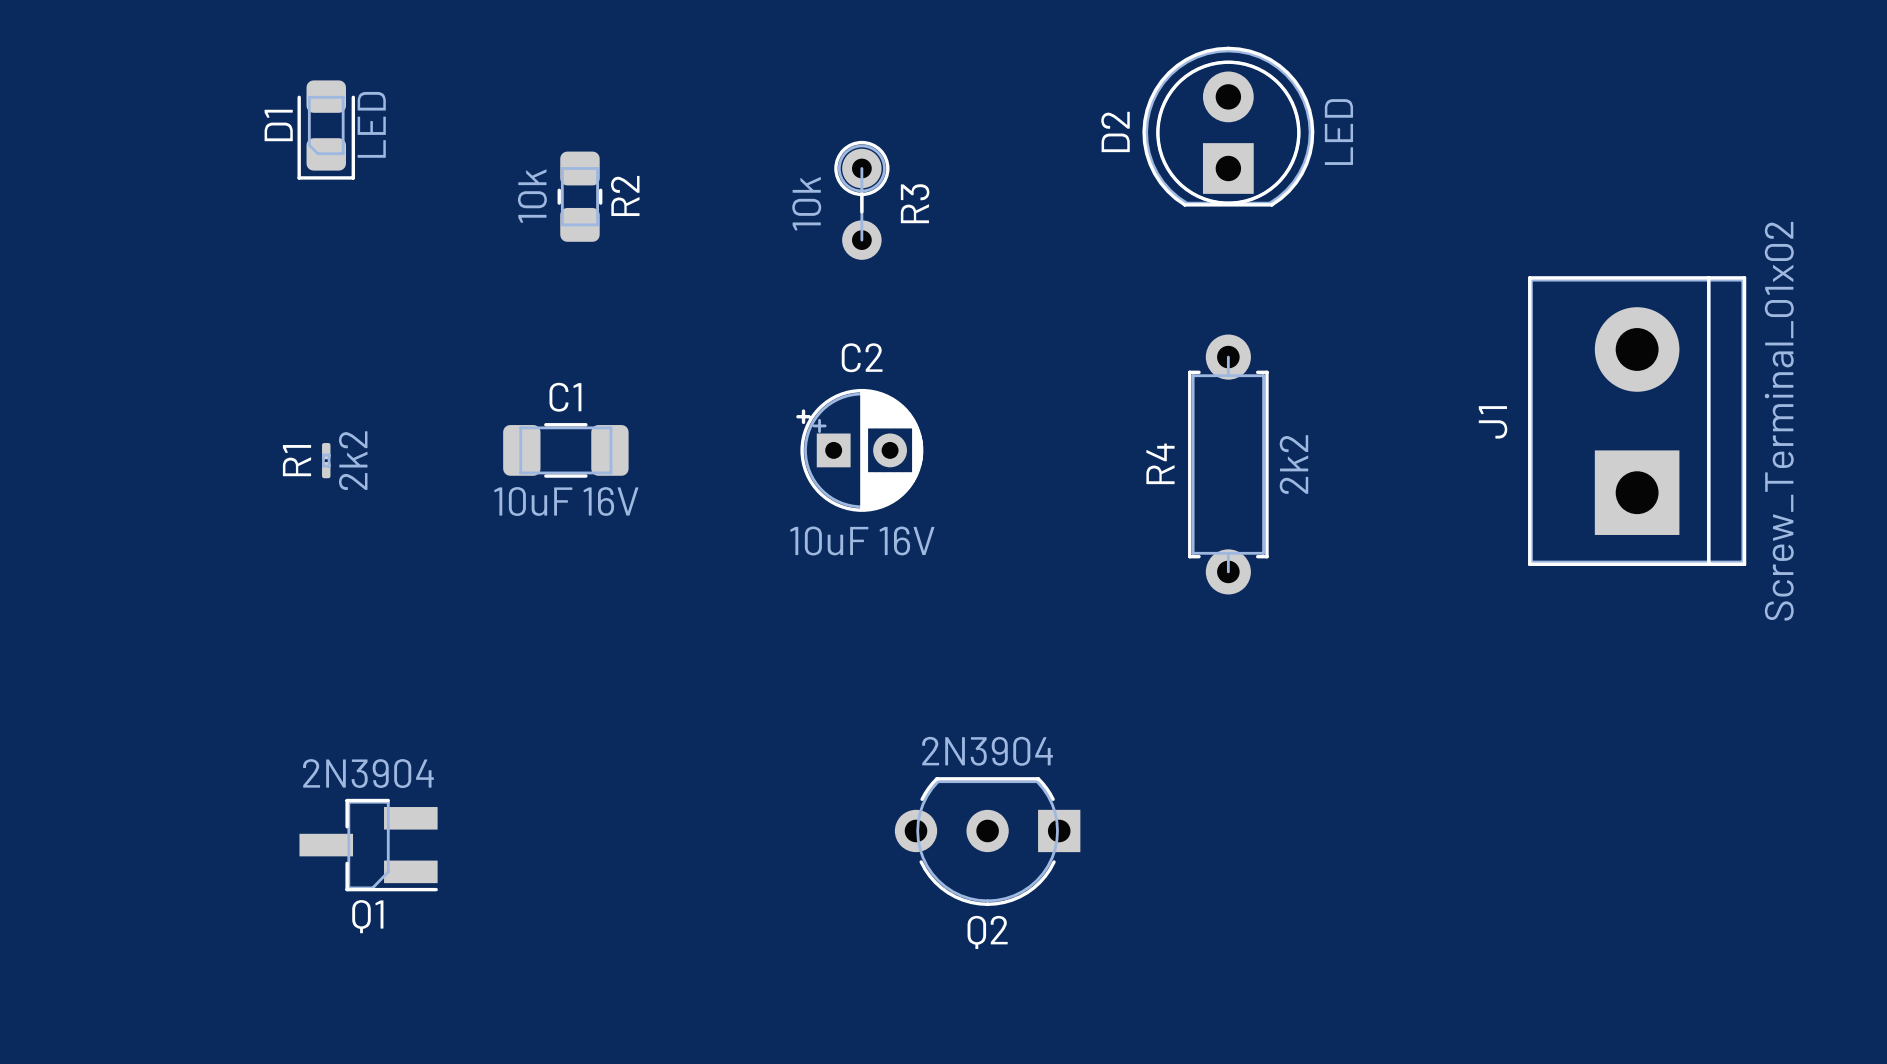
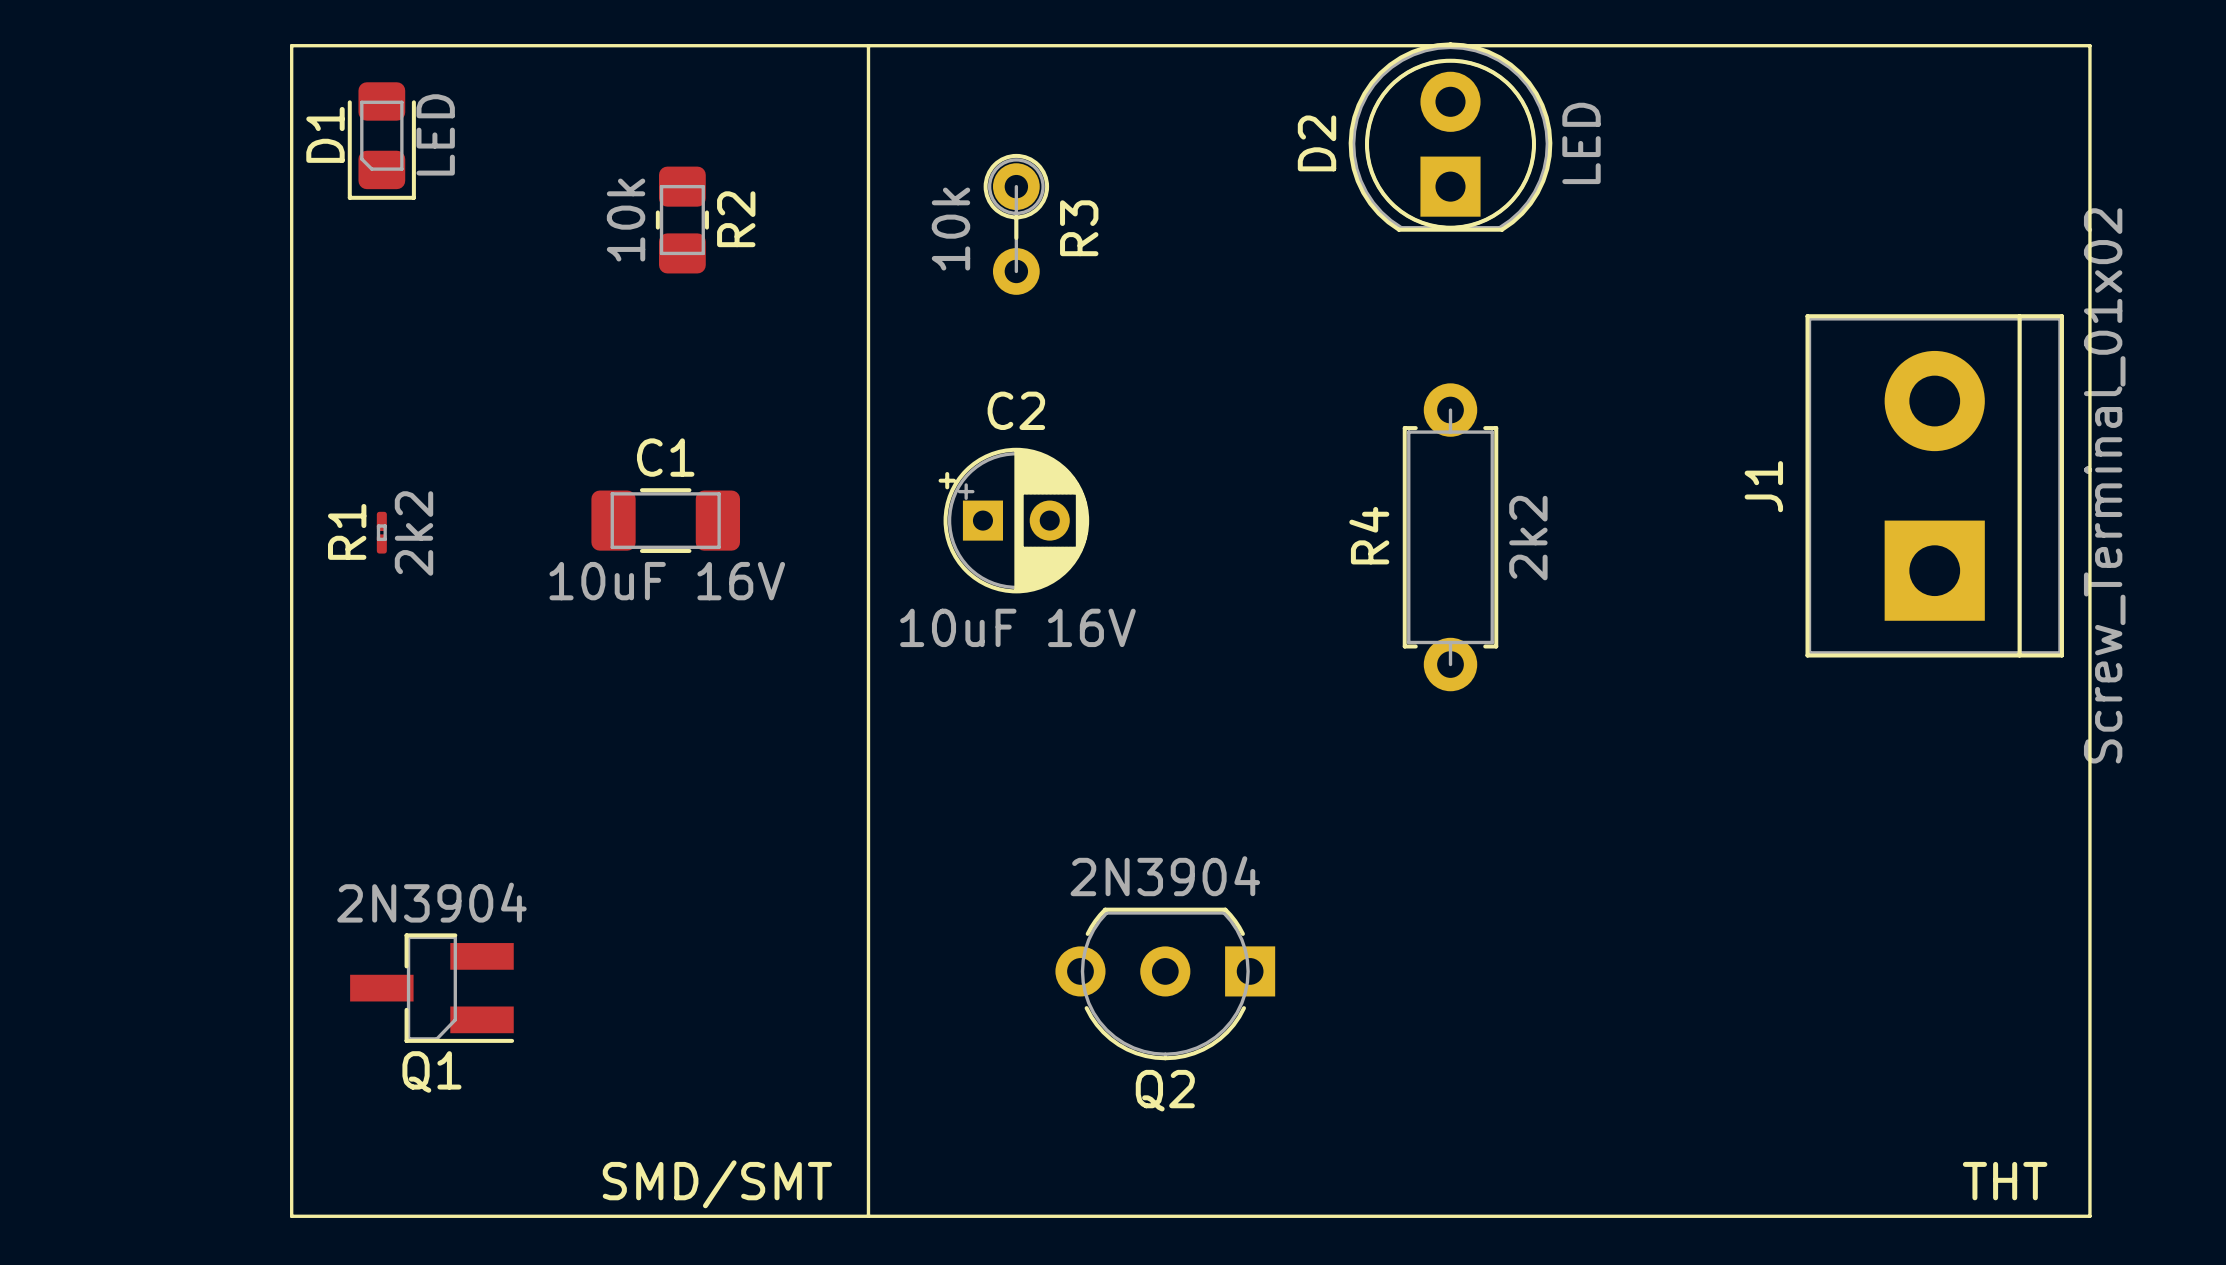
line: none -> (291, 45) (291, 1216) (2089, 1216) (2089, 45) (291, 45)
line: none -> (868, 45) (868, 1216)
text: none -> SMD/SMT (717, 1184)
text: none -> THT (2005, 1181)

